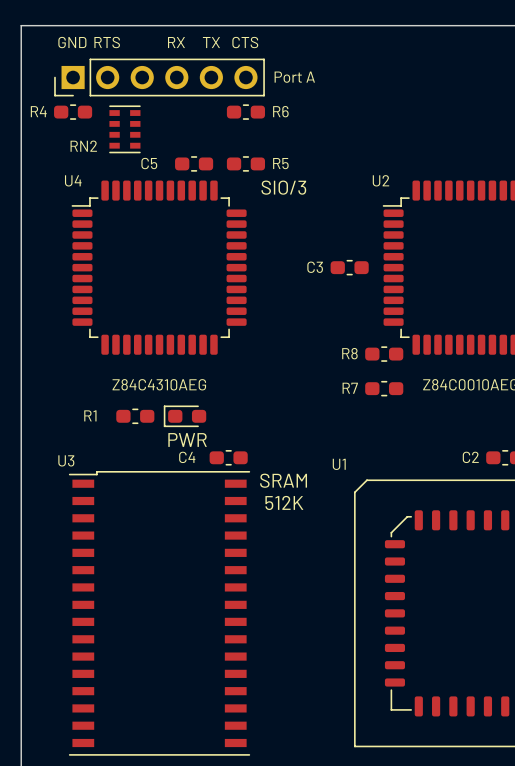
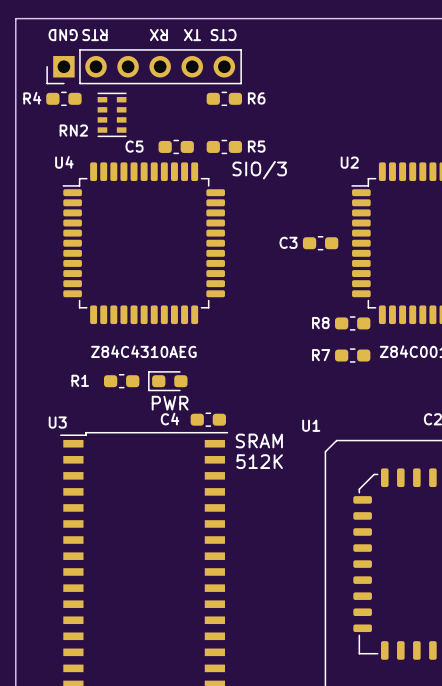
text rotation: 0° (72, 42) -> 180° (63, 35)
text rotation: 0° (107, 42) -> 180° (95, 35)
text rotation: 0° (176, 42) -> 180° (158, 35)
text rotation: 0° (211, 42) -> 180° (192, 35)
text rotation: 0° (245, 42) -> 180° (223, 35)
text: Port A (294, 77) -> none

